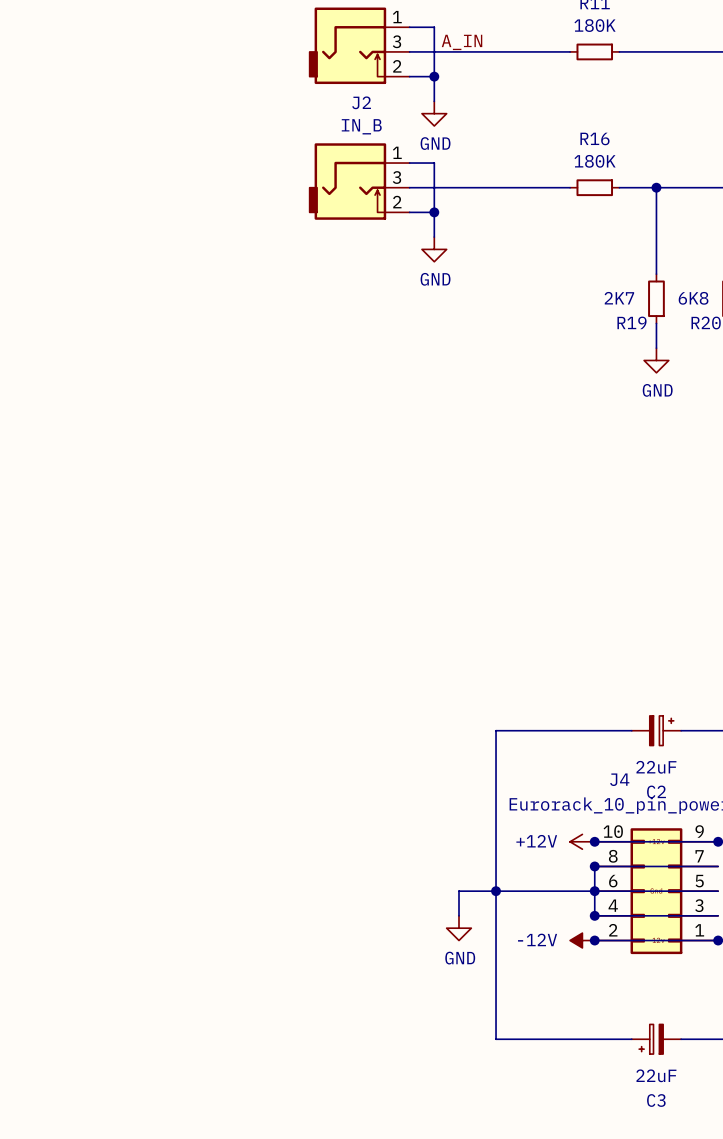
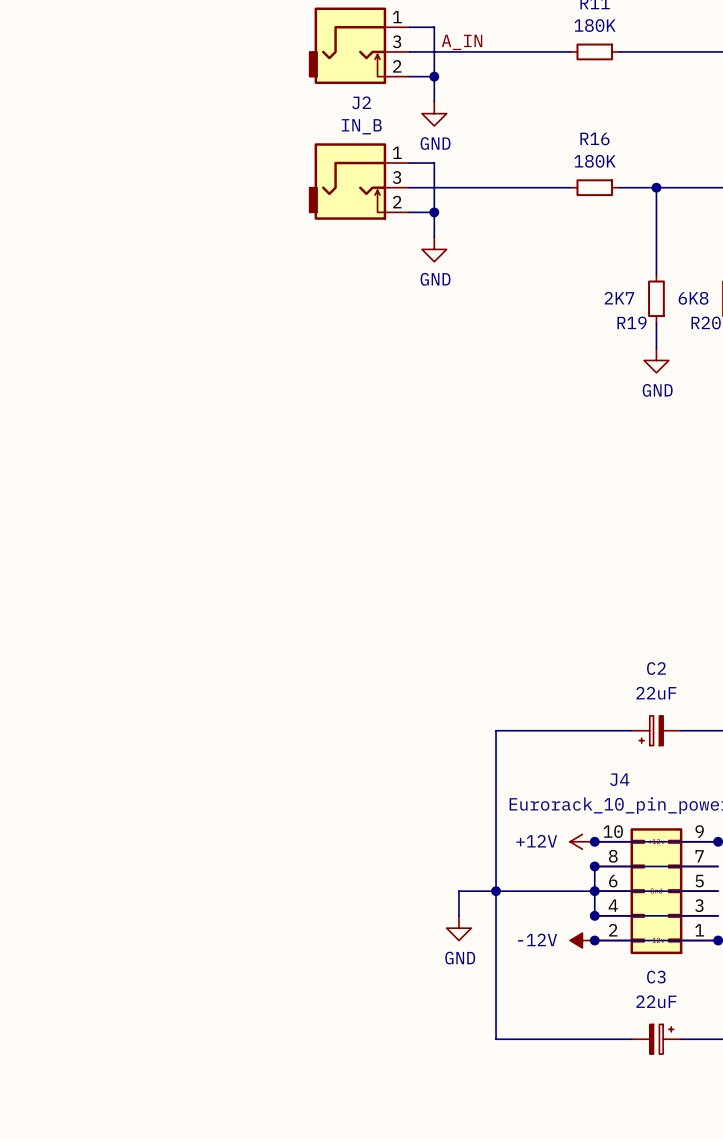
C2 rotation: 0° (661, 730) -> 180° (651, 730)
C3 rotation: 0° (651, 1039) -> 180° (661, 1039)

